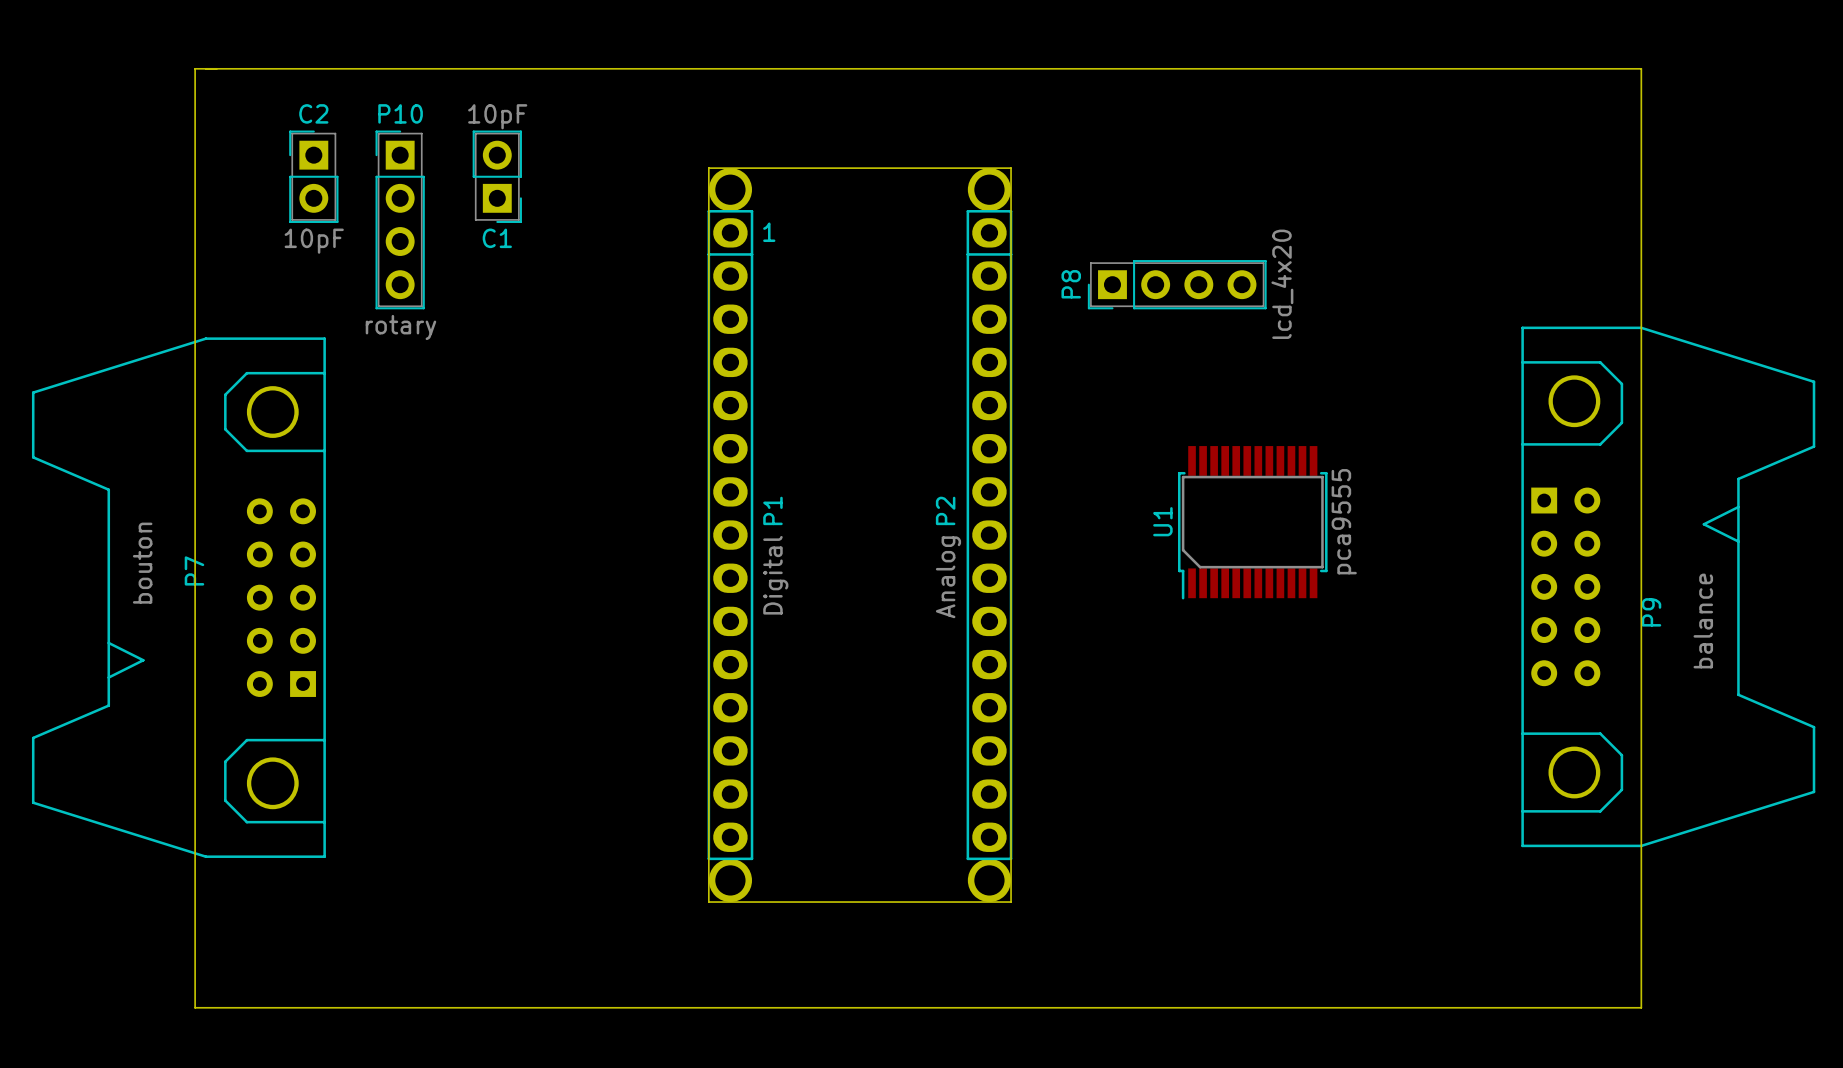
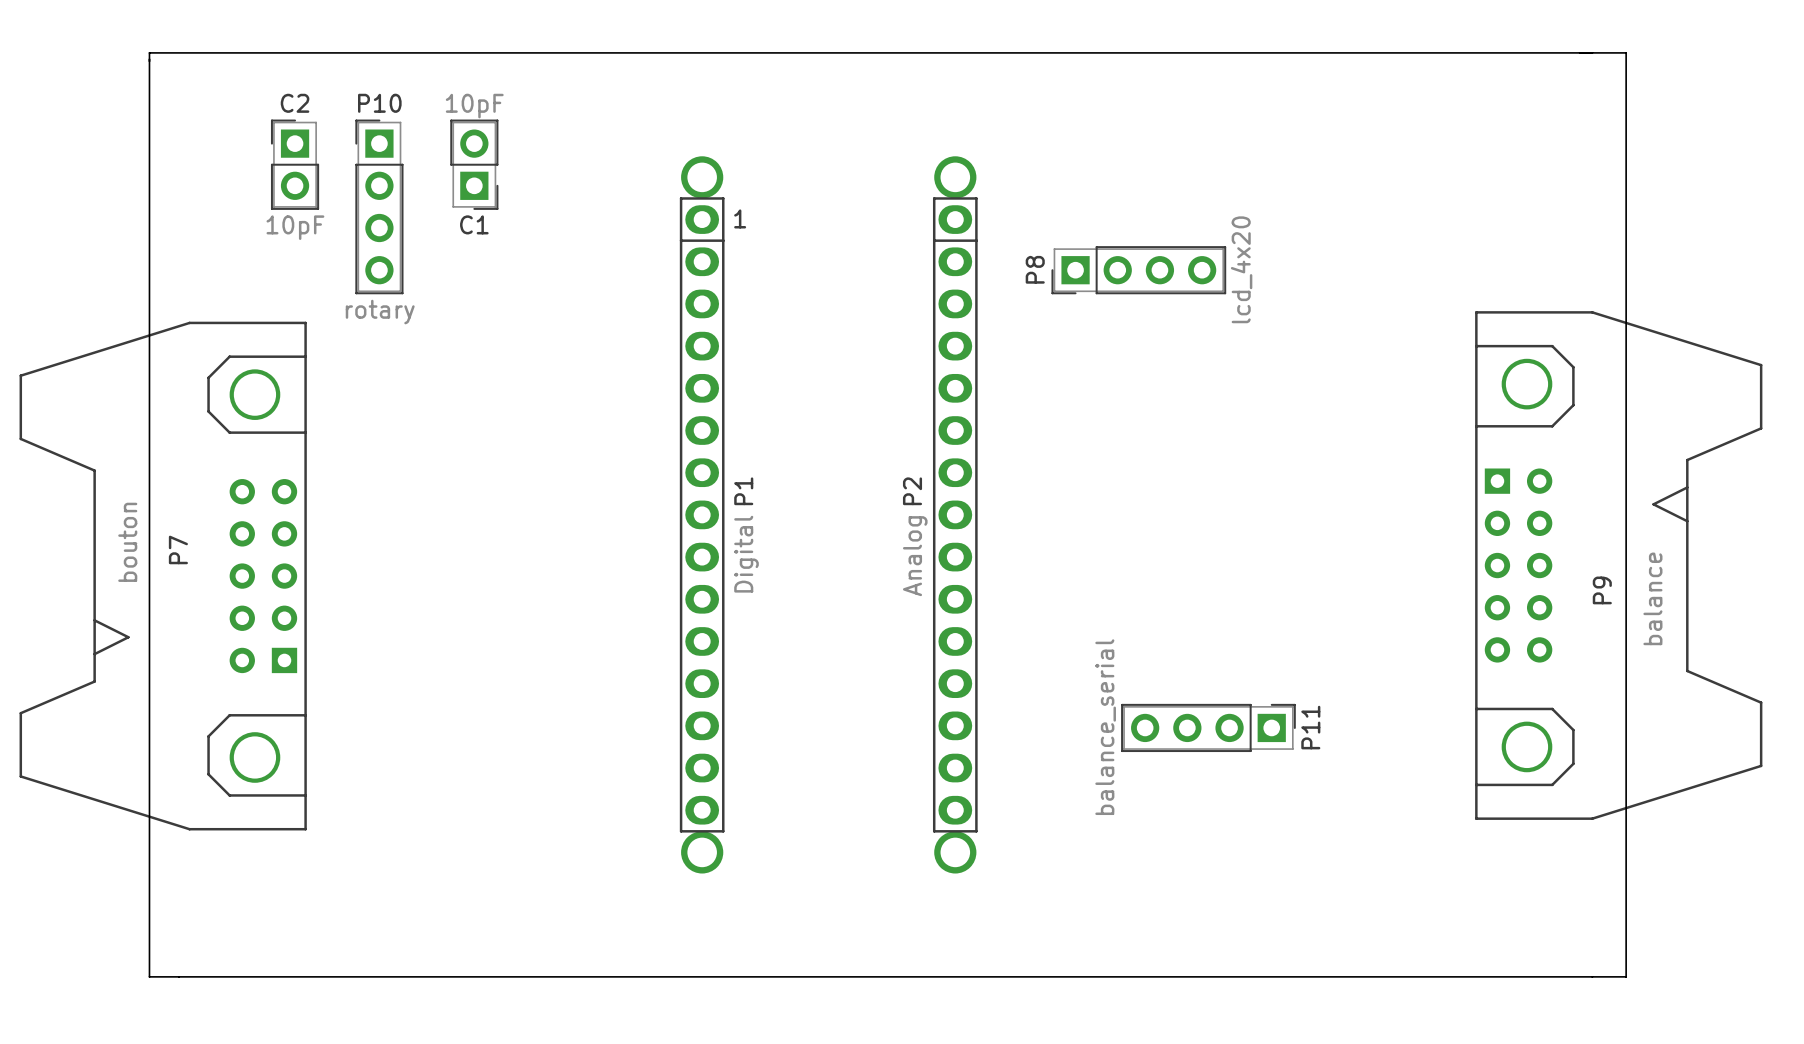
board edge: (708, 168) (708, 902) (1011, 902) (1011, 168) (708, 168) -> none
U1: pca9555 (1252, 522) -> none
P11: none -> balance_serial (1208, 727)
board edge: (195, 1007) (195, 68) (1641, 68) (1641, 1007) -> (179, 976) (149, 976) (149, 52) (1626, 52) (1626, 976) (1592, 976)

